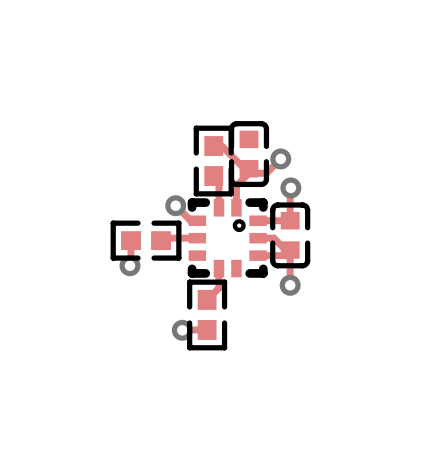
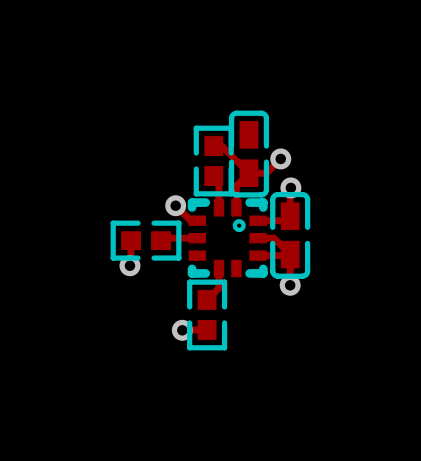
part footprint: [228, 121, 270, 188] -> [228, 110, 270, 198]
part footprint: [270, 202, 311, 269] -> [270, 191, 311, 279]

